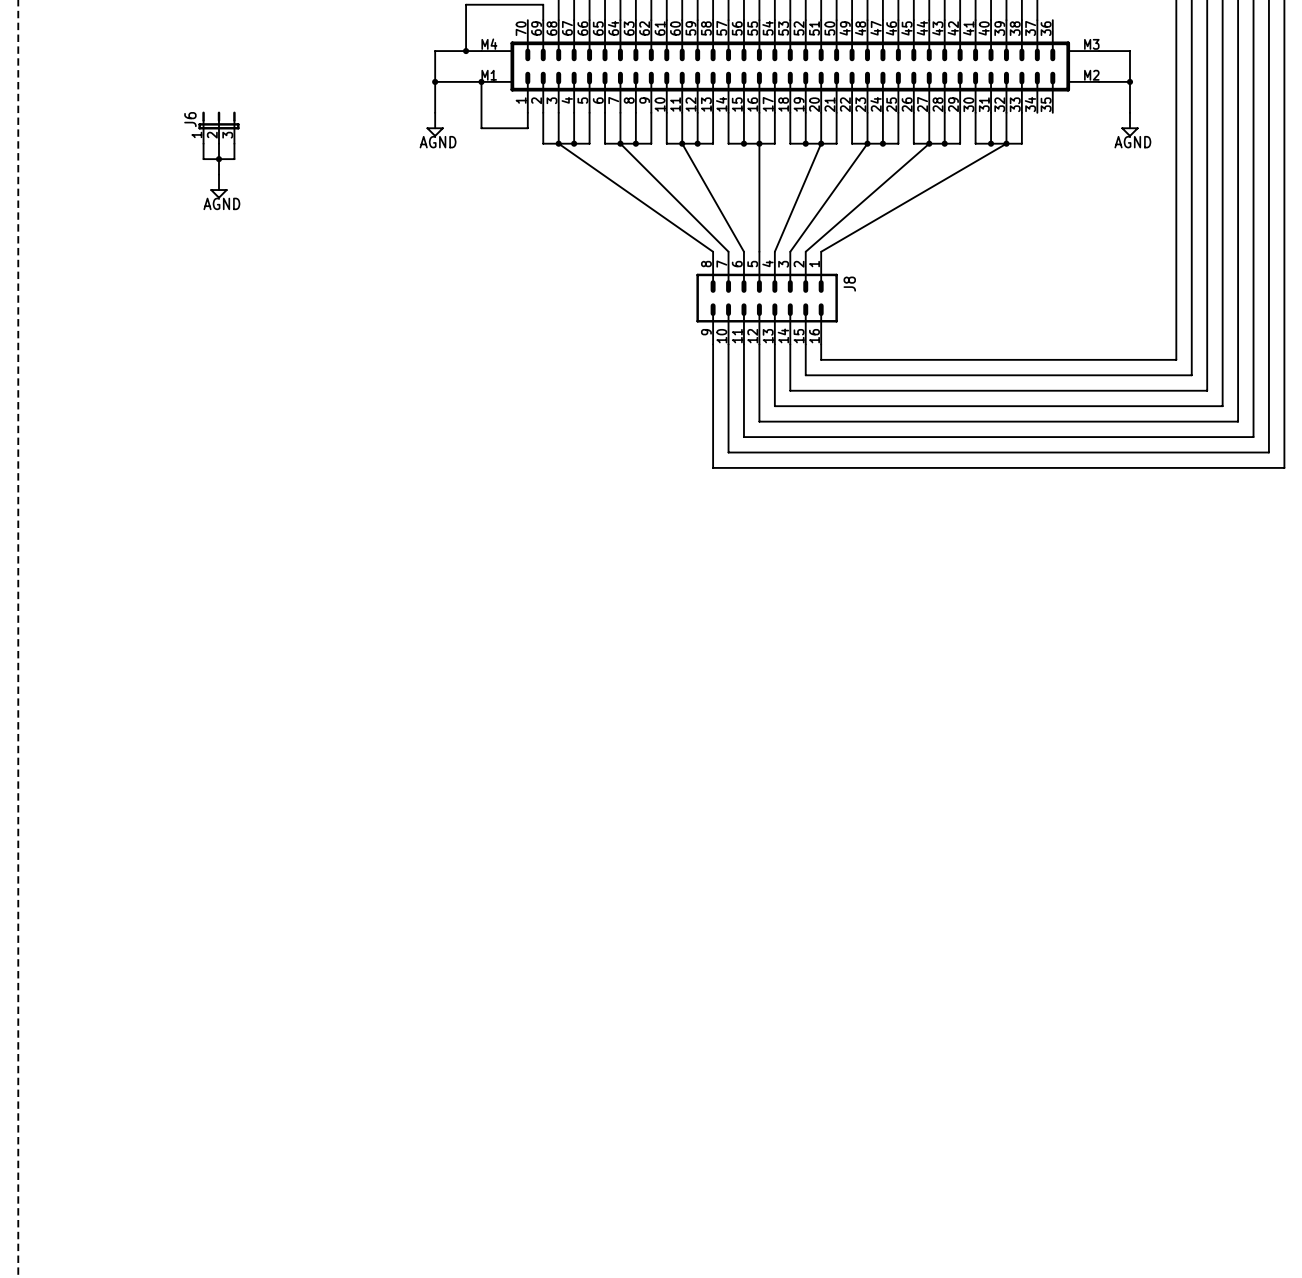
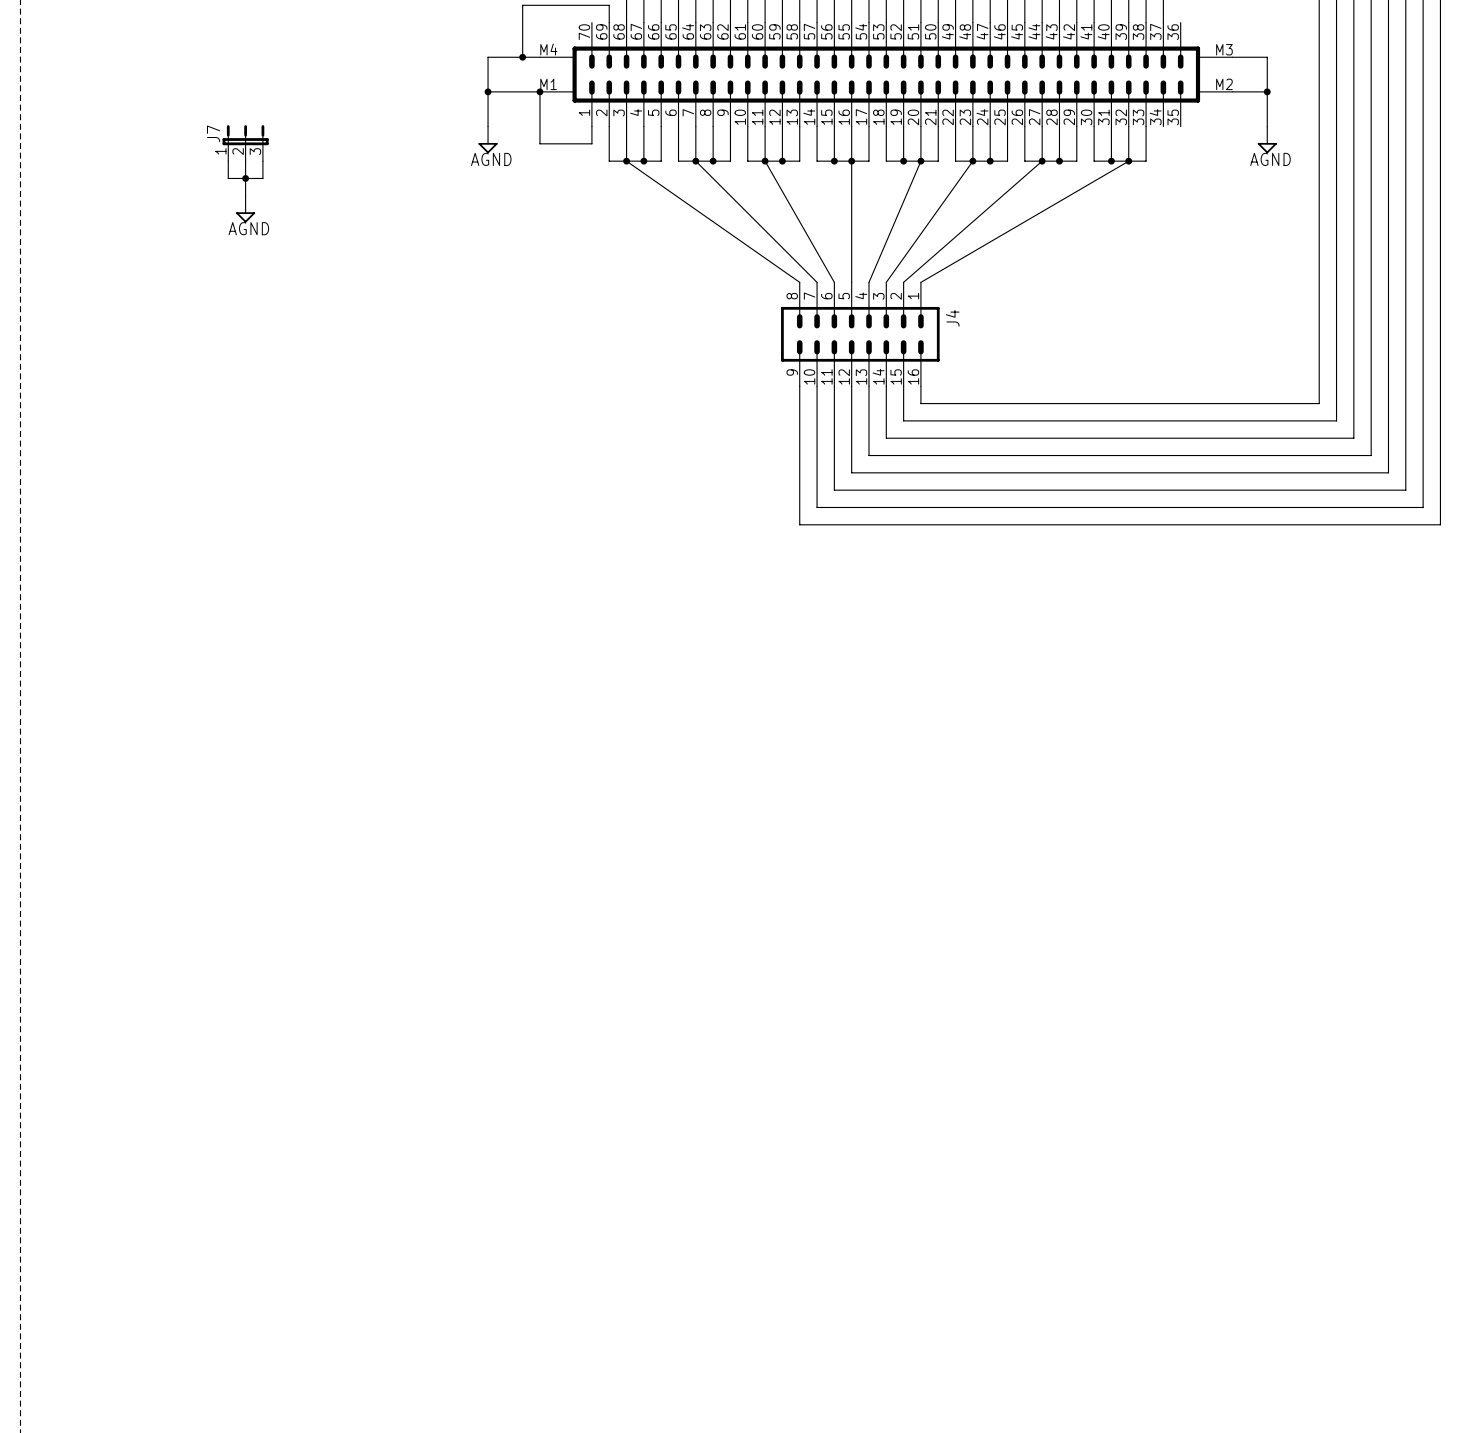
J6 name: J6 (190, 119) -> J7 (213, 133)
J8 name: J8 (849, 284) -> J4 (952, 318)

